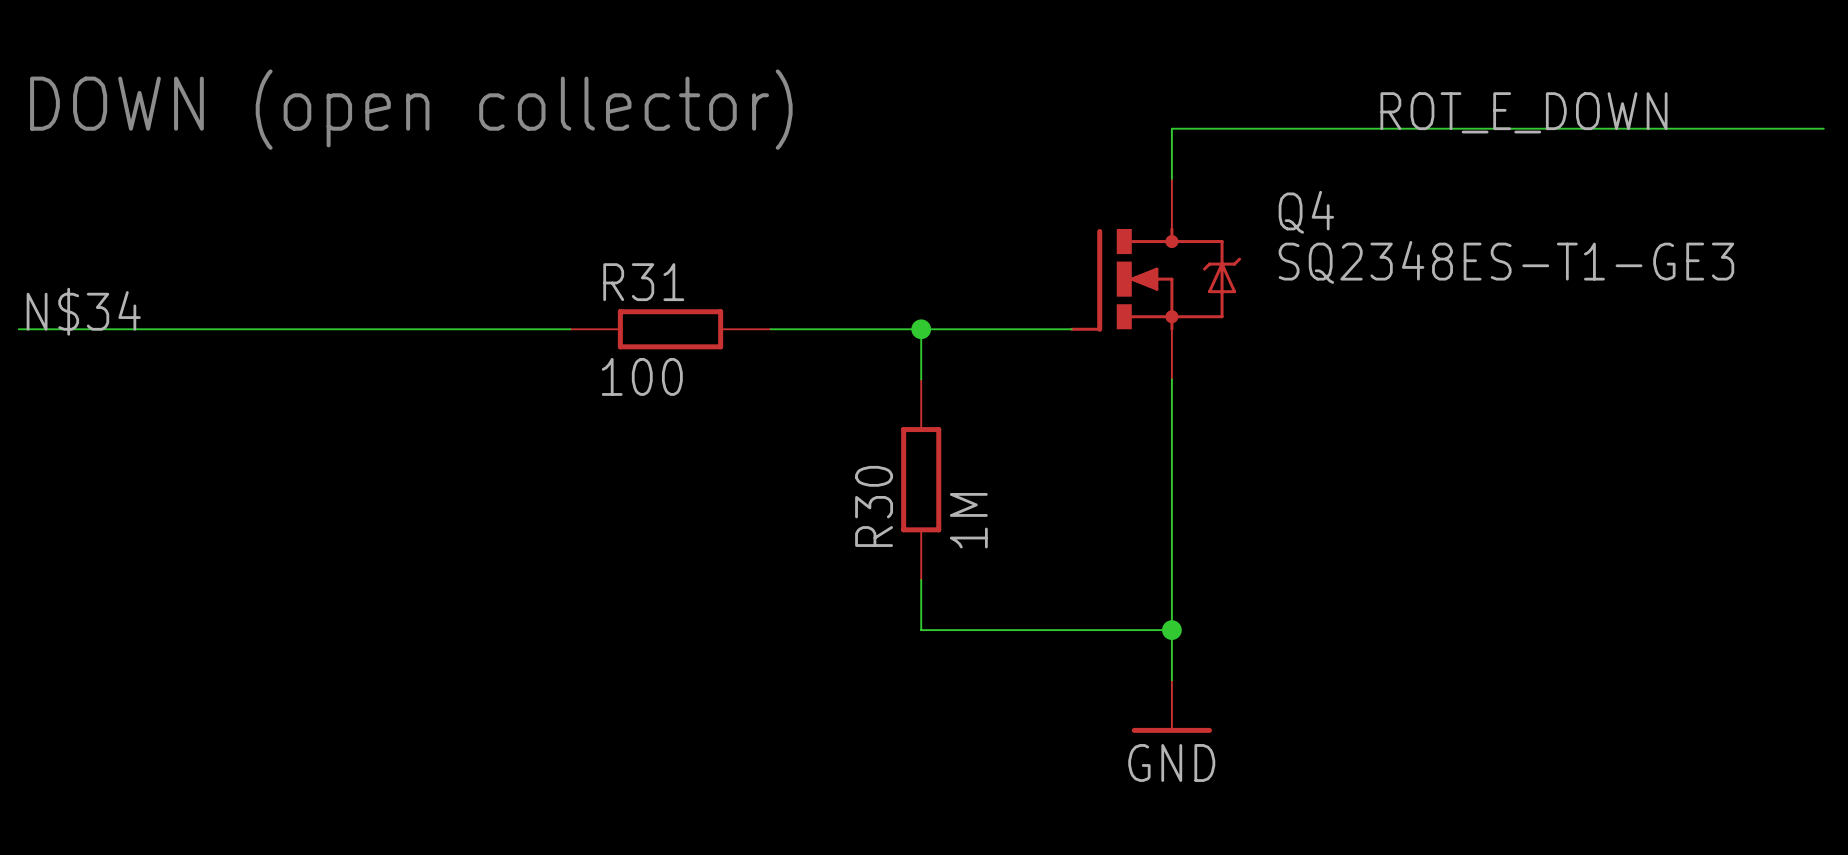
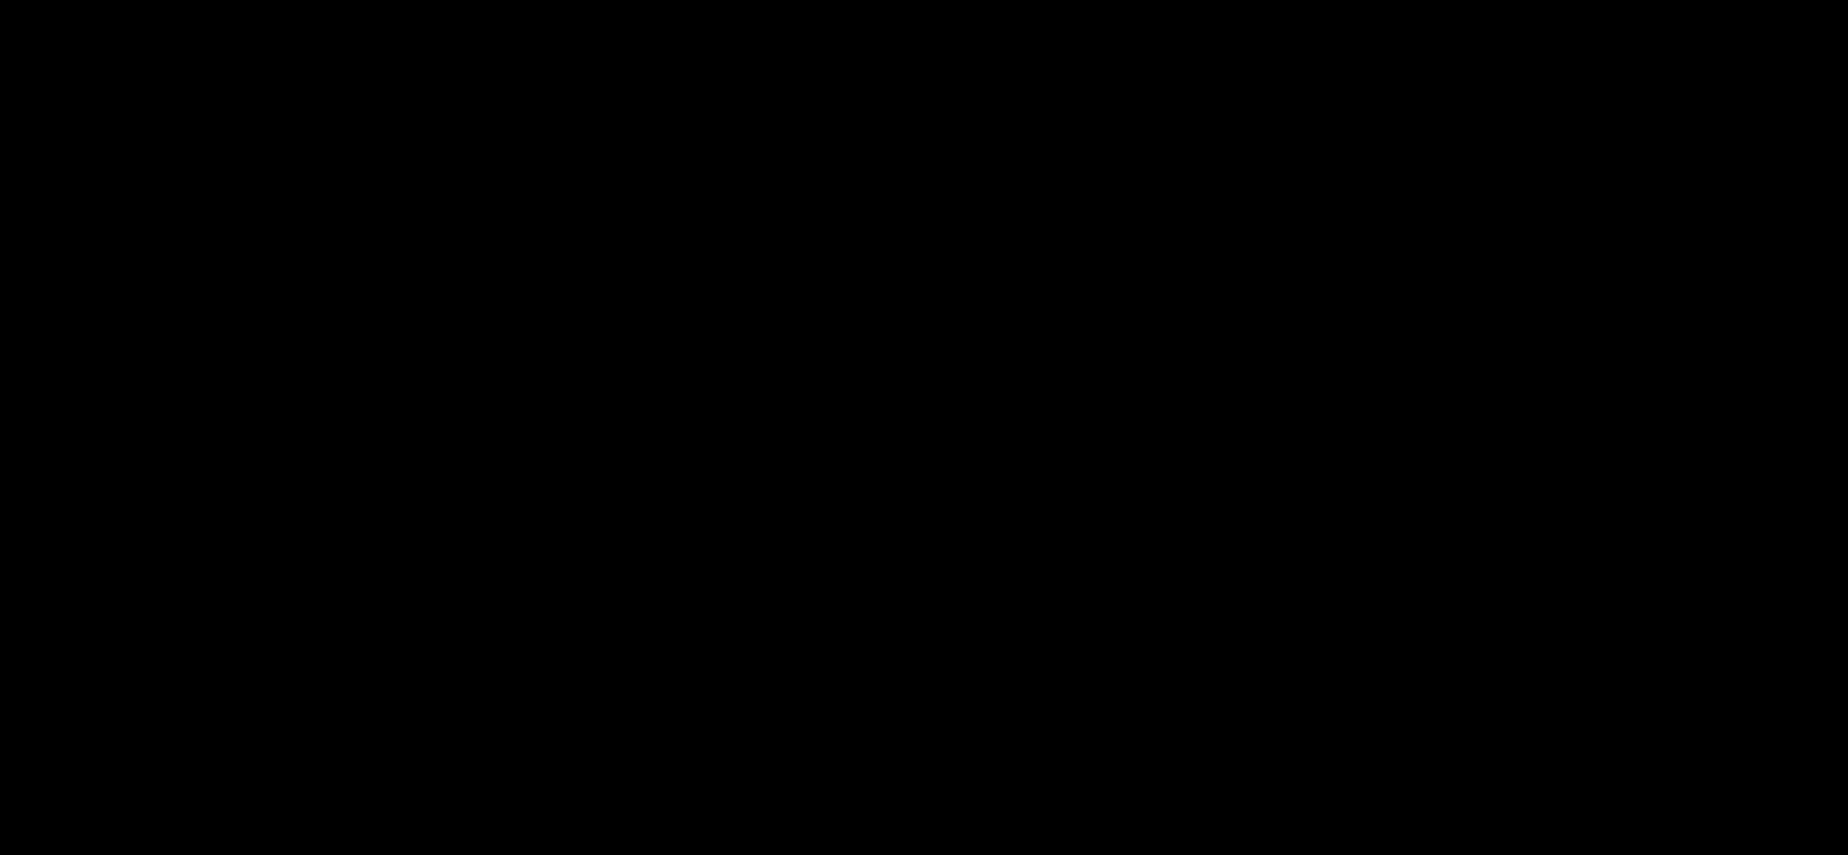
text: DOWN (open collector) (411, 109) -> none
label: ROT_E_DOWN (1523, 112) -> none
wire: (1823, 128) (1171, 128) (1171, 178) -> none
Q4: SQ2348ES-T1-GE3 (1155, 279) -> none
label: N$34 (83, 311) -> none
wire: (18, 329) (570, 329) -> none
R31: 100 (670, 329) -> none
wire: (770, 329) (1071, 329) -> none
wire: (921, 329) (921, 379) -> none
junction: (921, 329) -> none
wire: (1171, 379) (1171, 680) -> none
R30: 1M (921, 479) -> none
wire: (921, 579) (921, 630) (1171, 630) -> none
junction: (1171, 630) -> none
power symbol: GND (1171, 706) -> none

